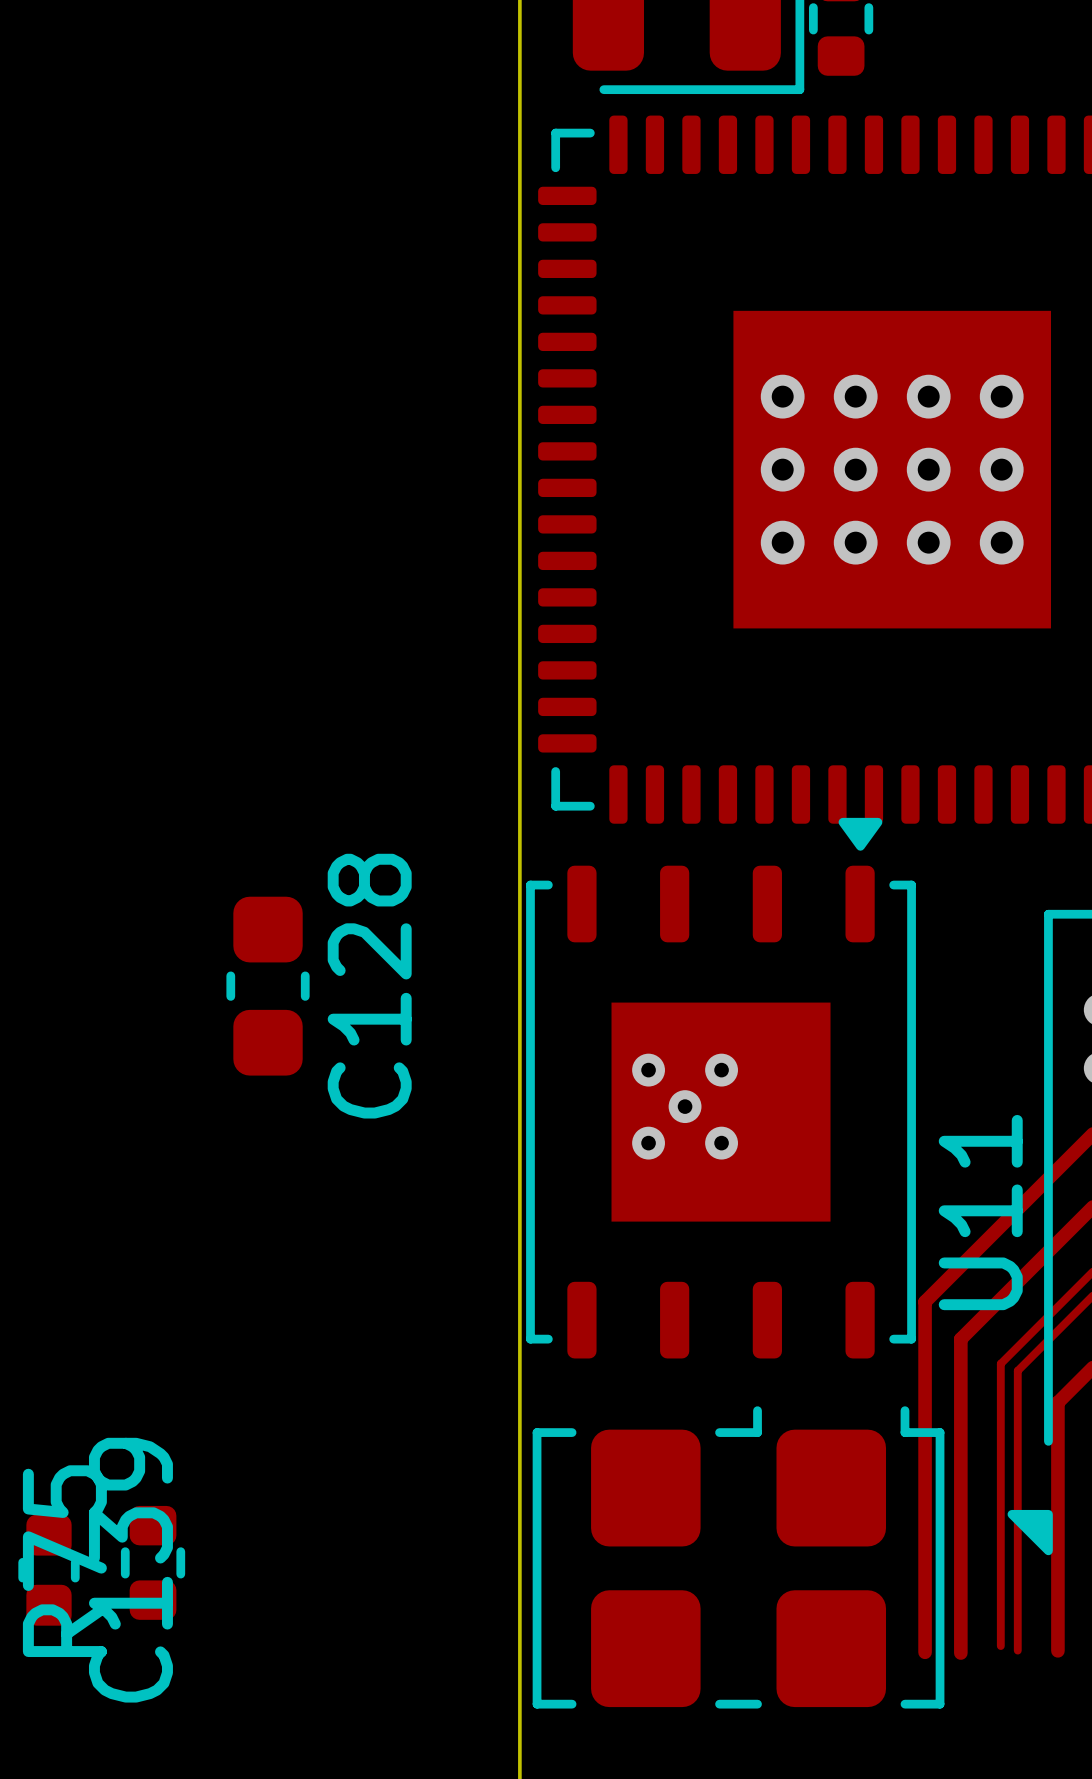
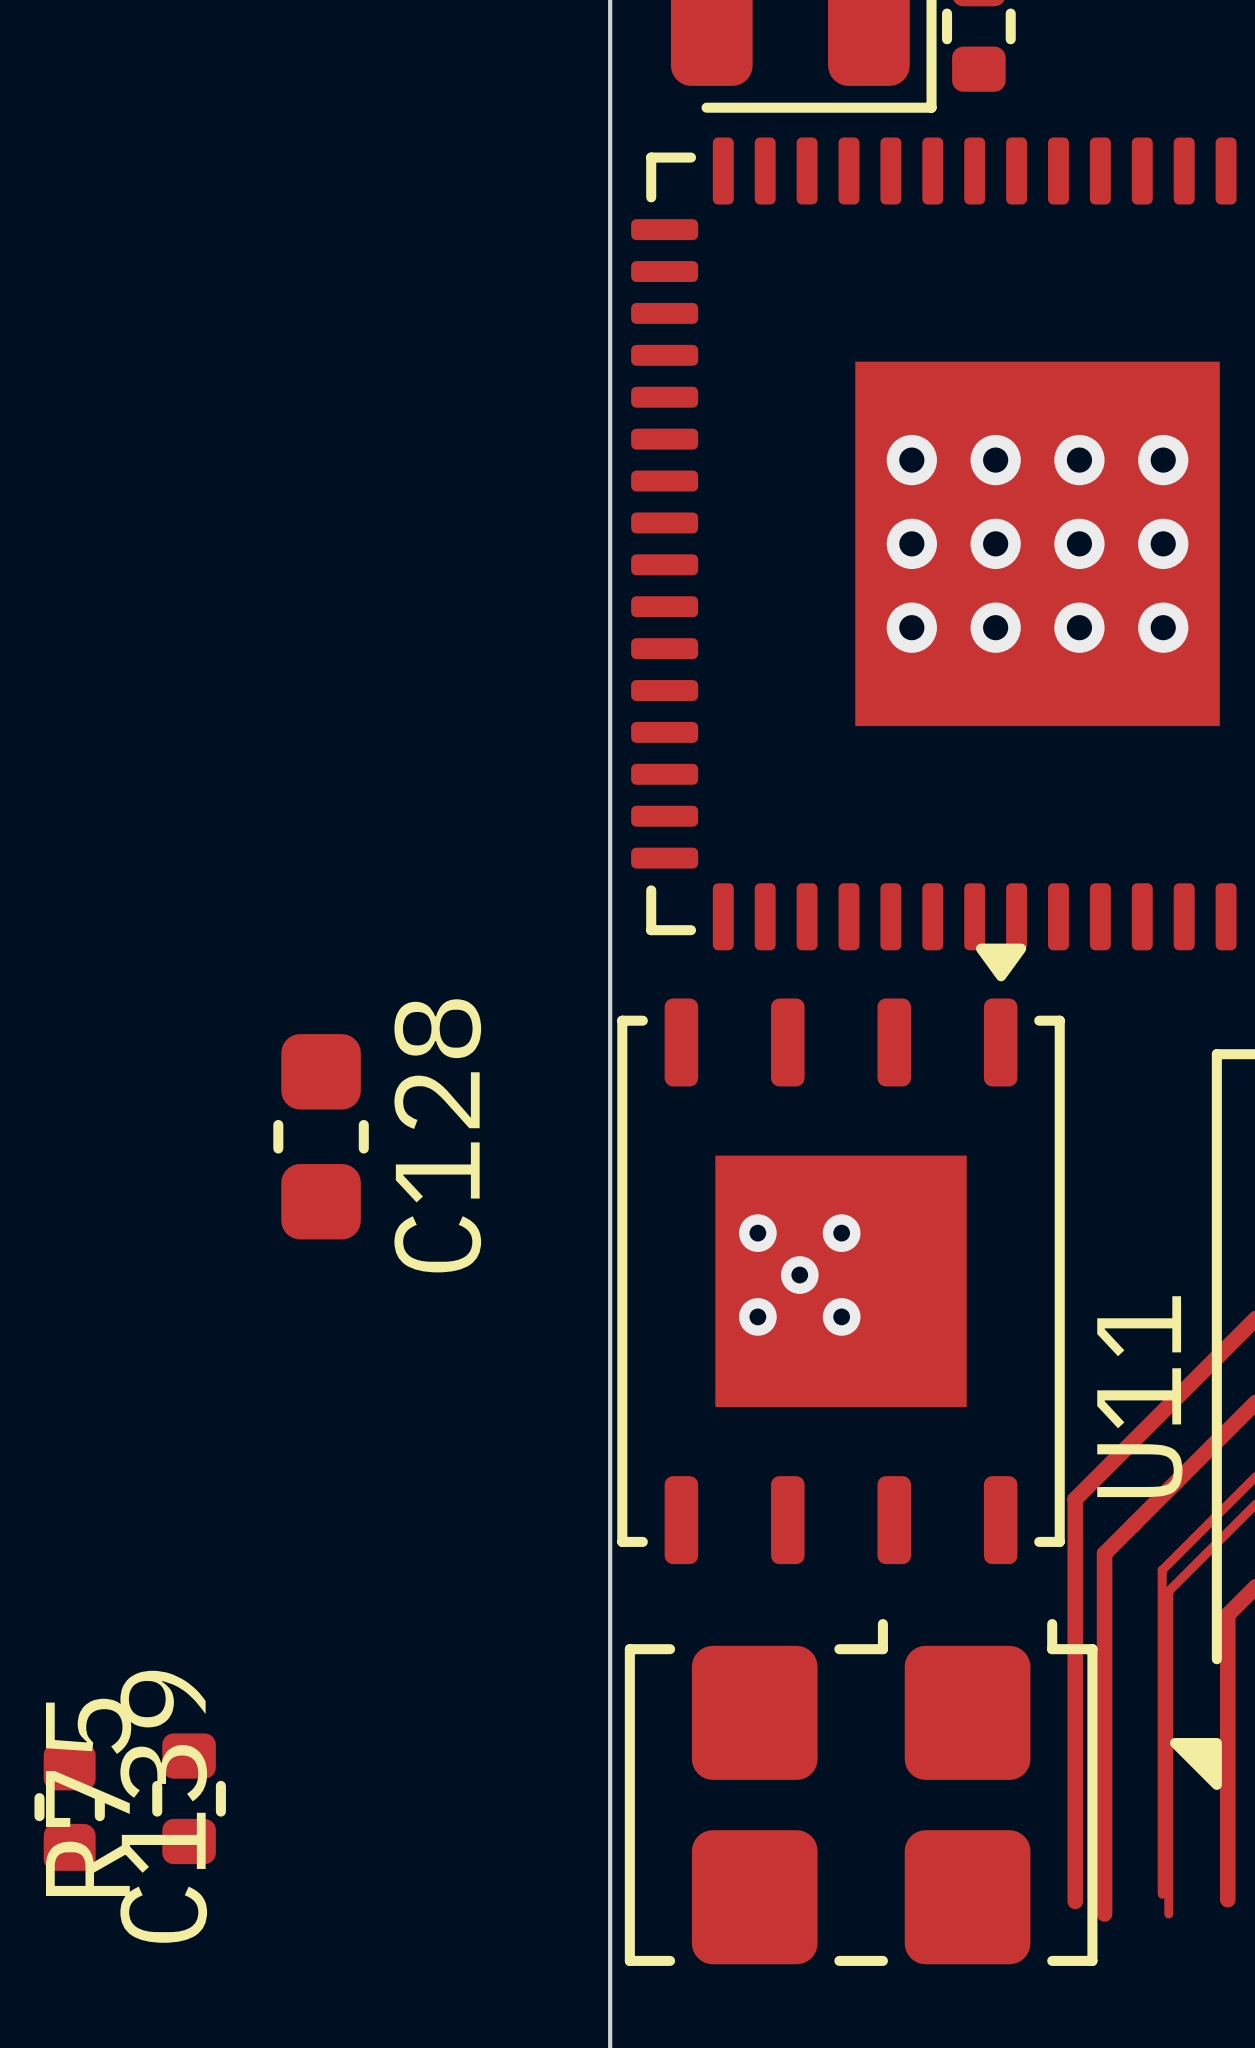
track: (960, 1339) (960, 1653) -> (1116, 1541) (1104, 1553) (1104, 1913)
track: (1017, 1370) (1017, 1650) -> (1181, 1578) (1168, 1591) (1168, 1913)

